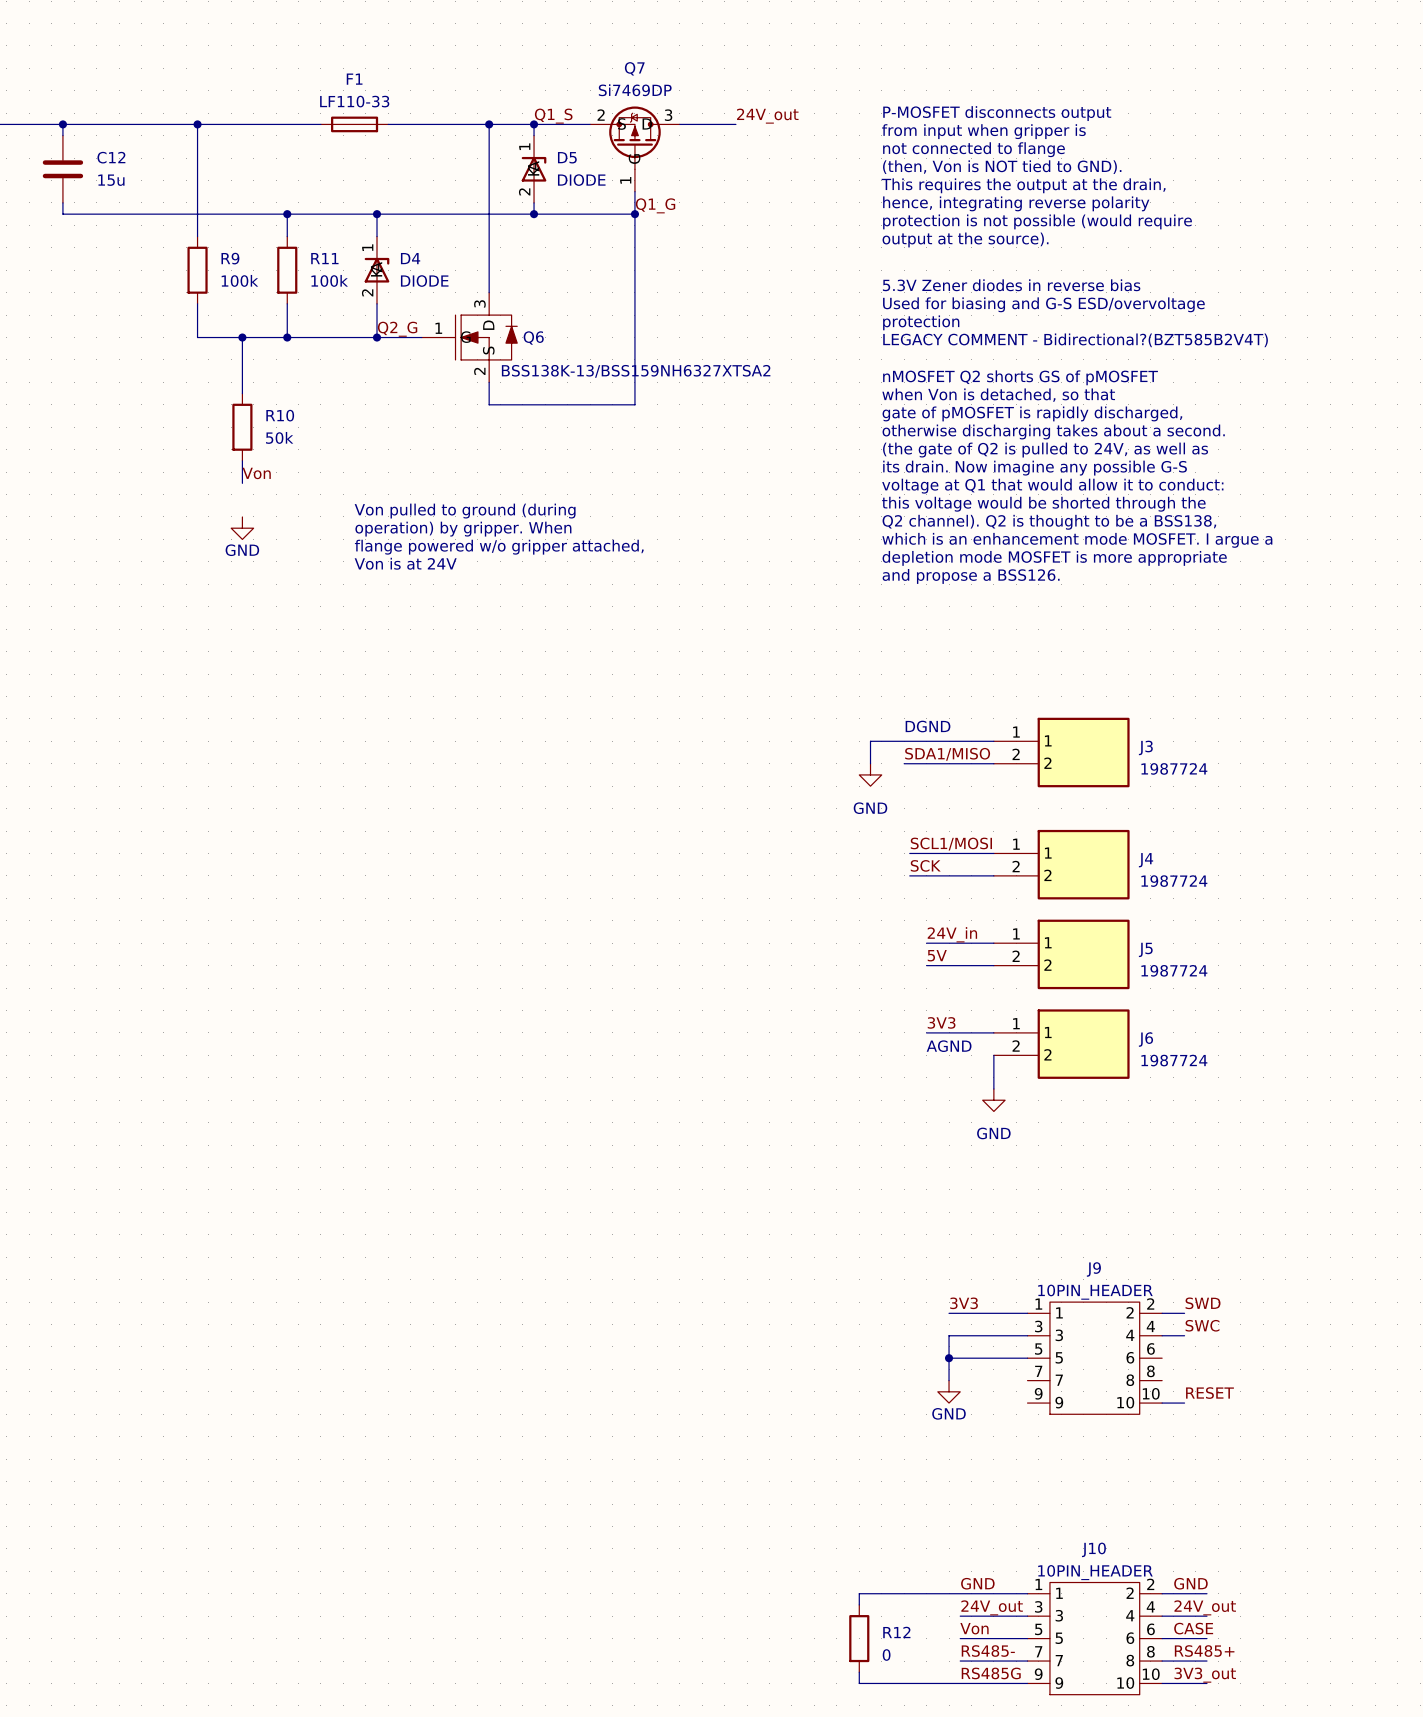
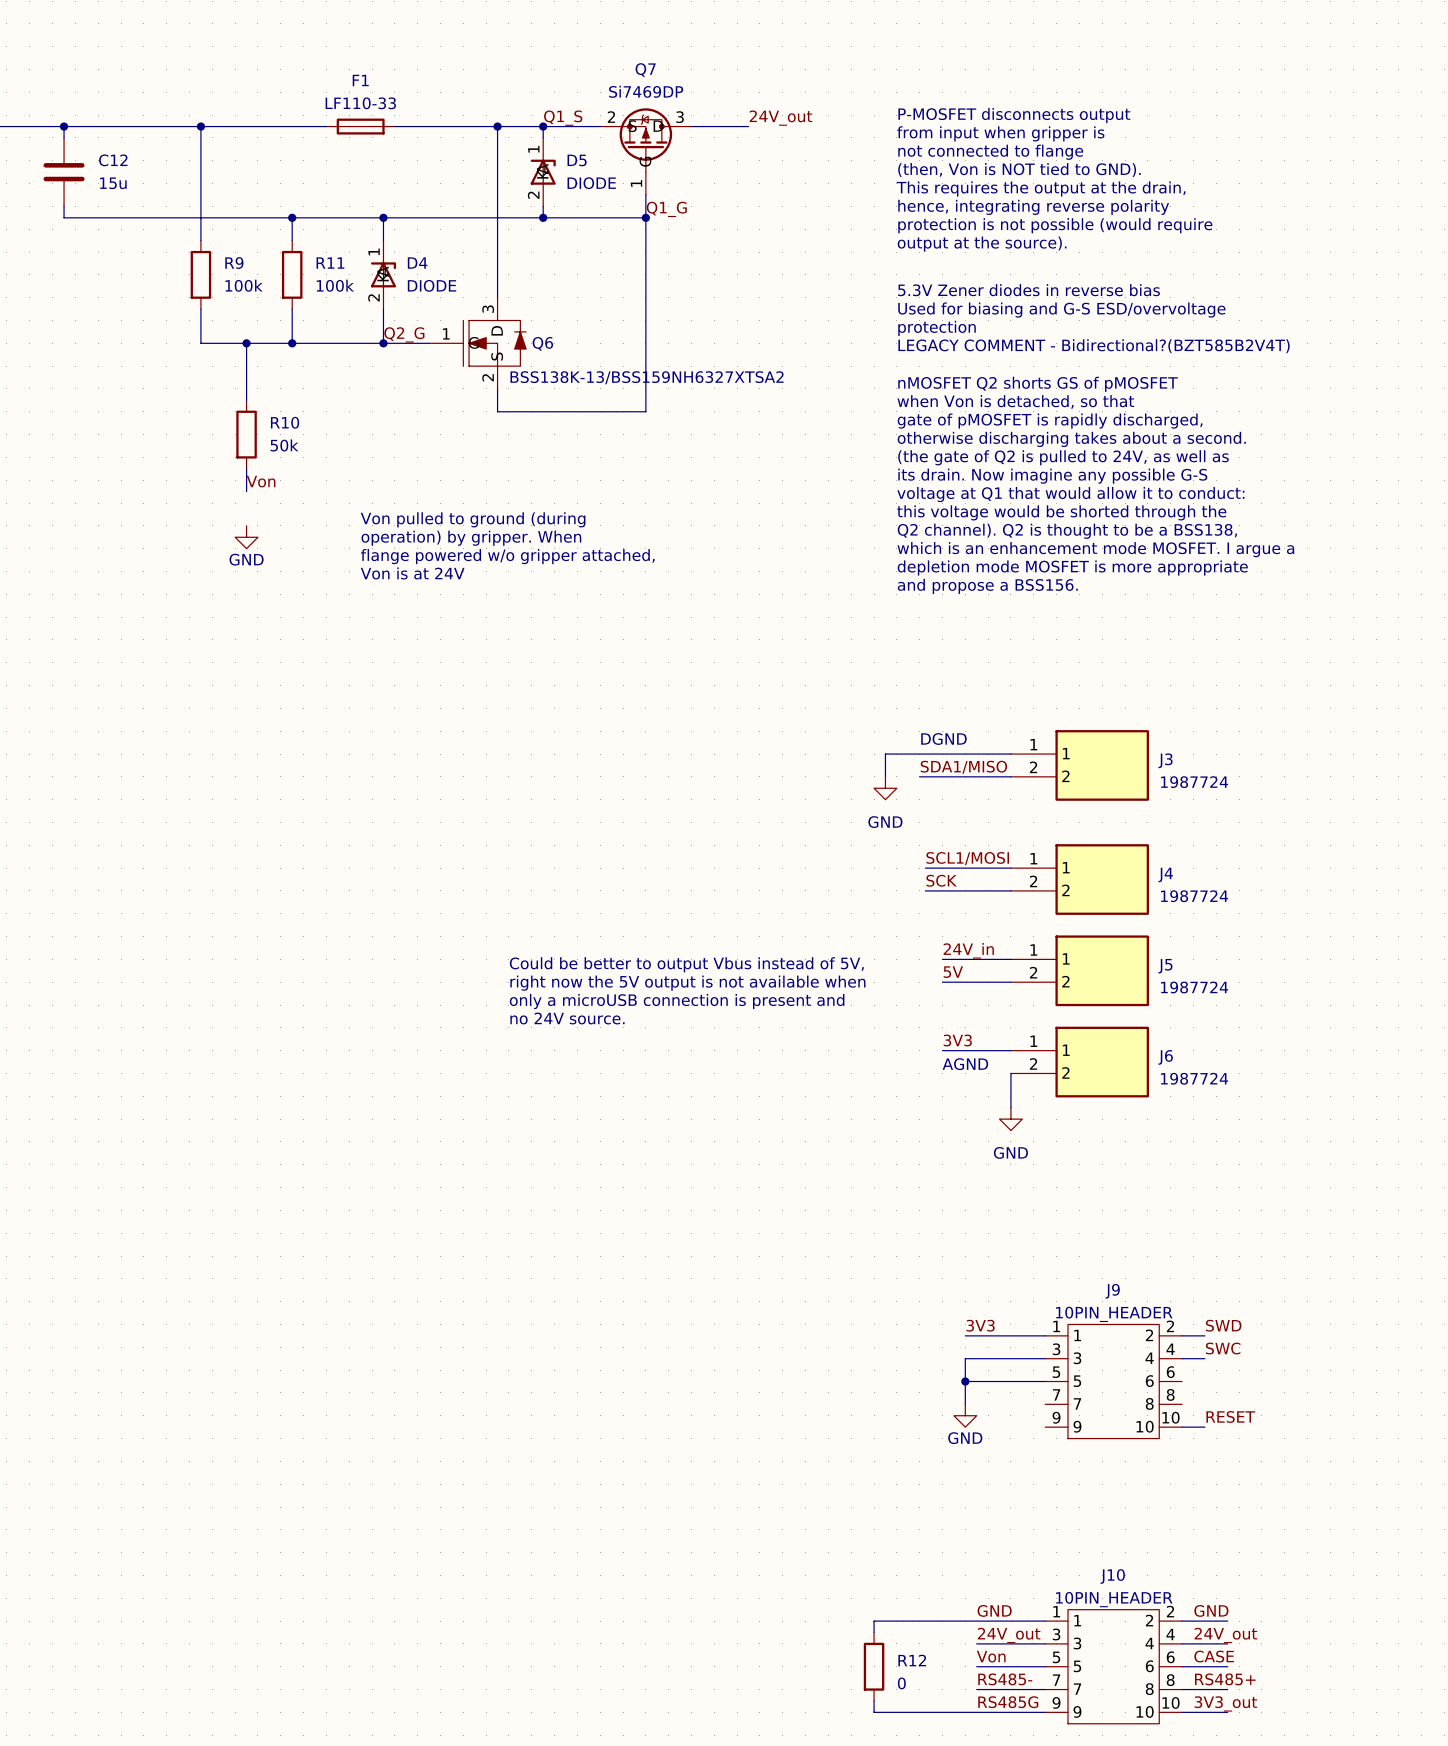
text: and propose a BSS126. (971, 576) -> and propose a BSS156. (987, 586)
text: none -> Could be better to output Vbus instead of 5V, (686, 964)
text: none -> right now the 5V output is not available when (687, 983)
text: none -> only a microUSB connection is present and (677, 1001)
text: none -> no 24V source. (567, 1018)

